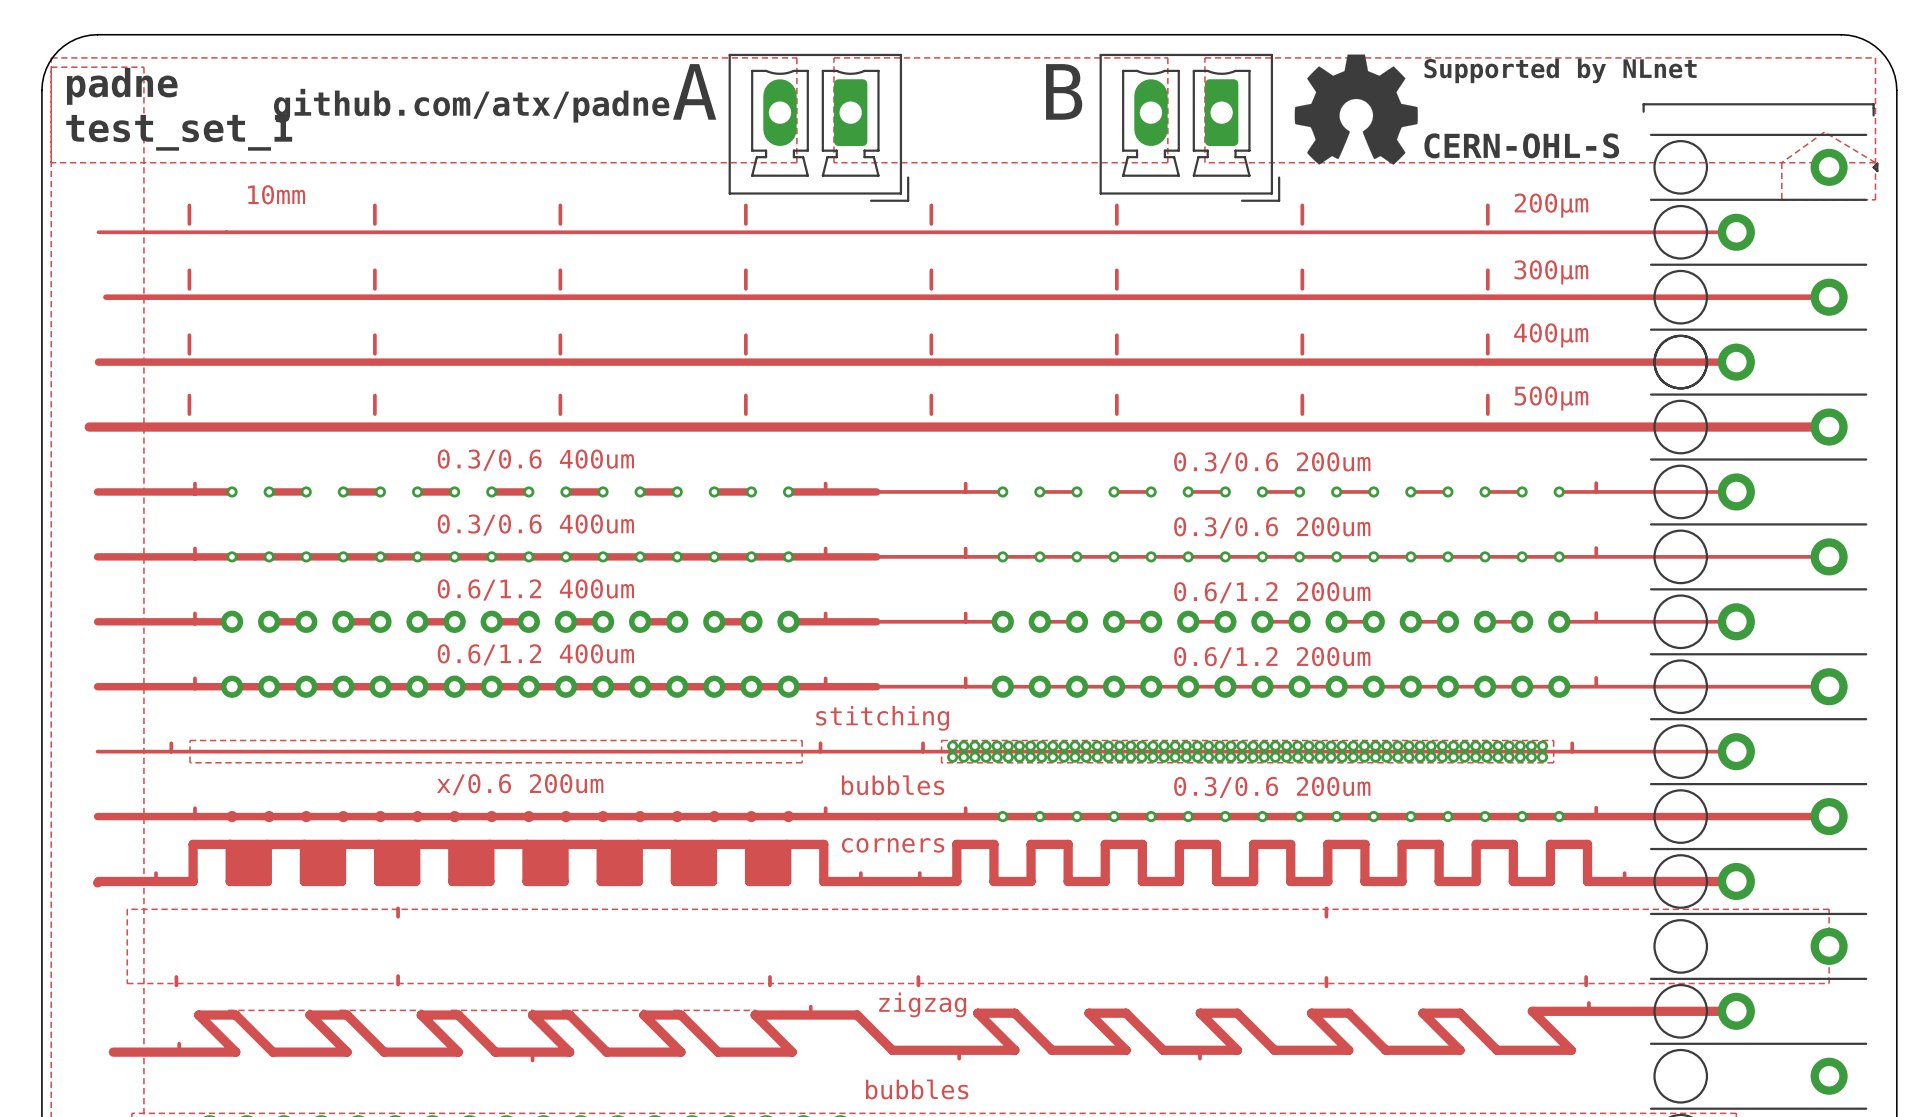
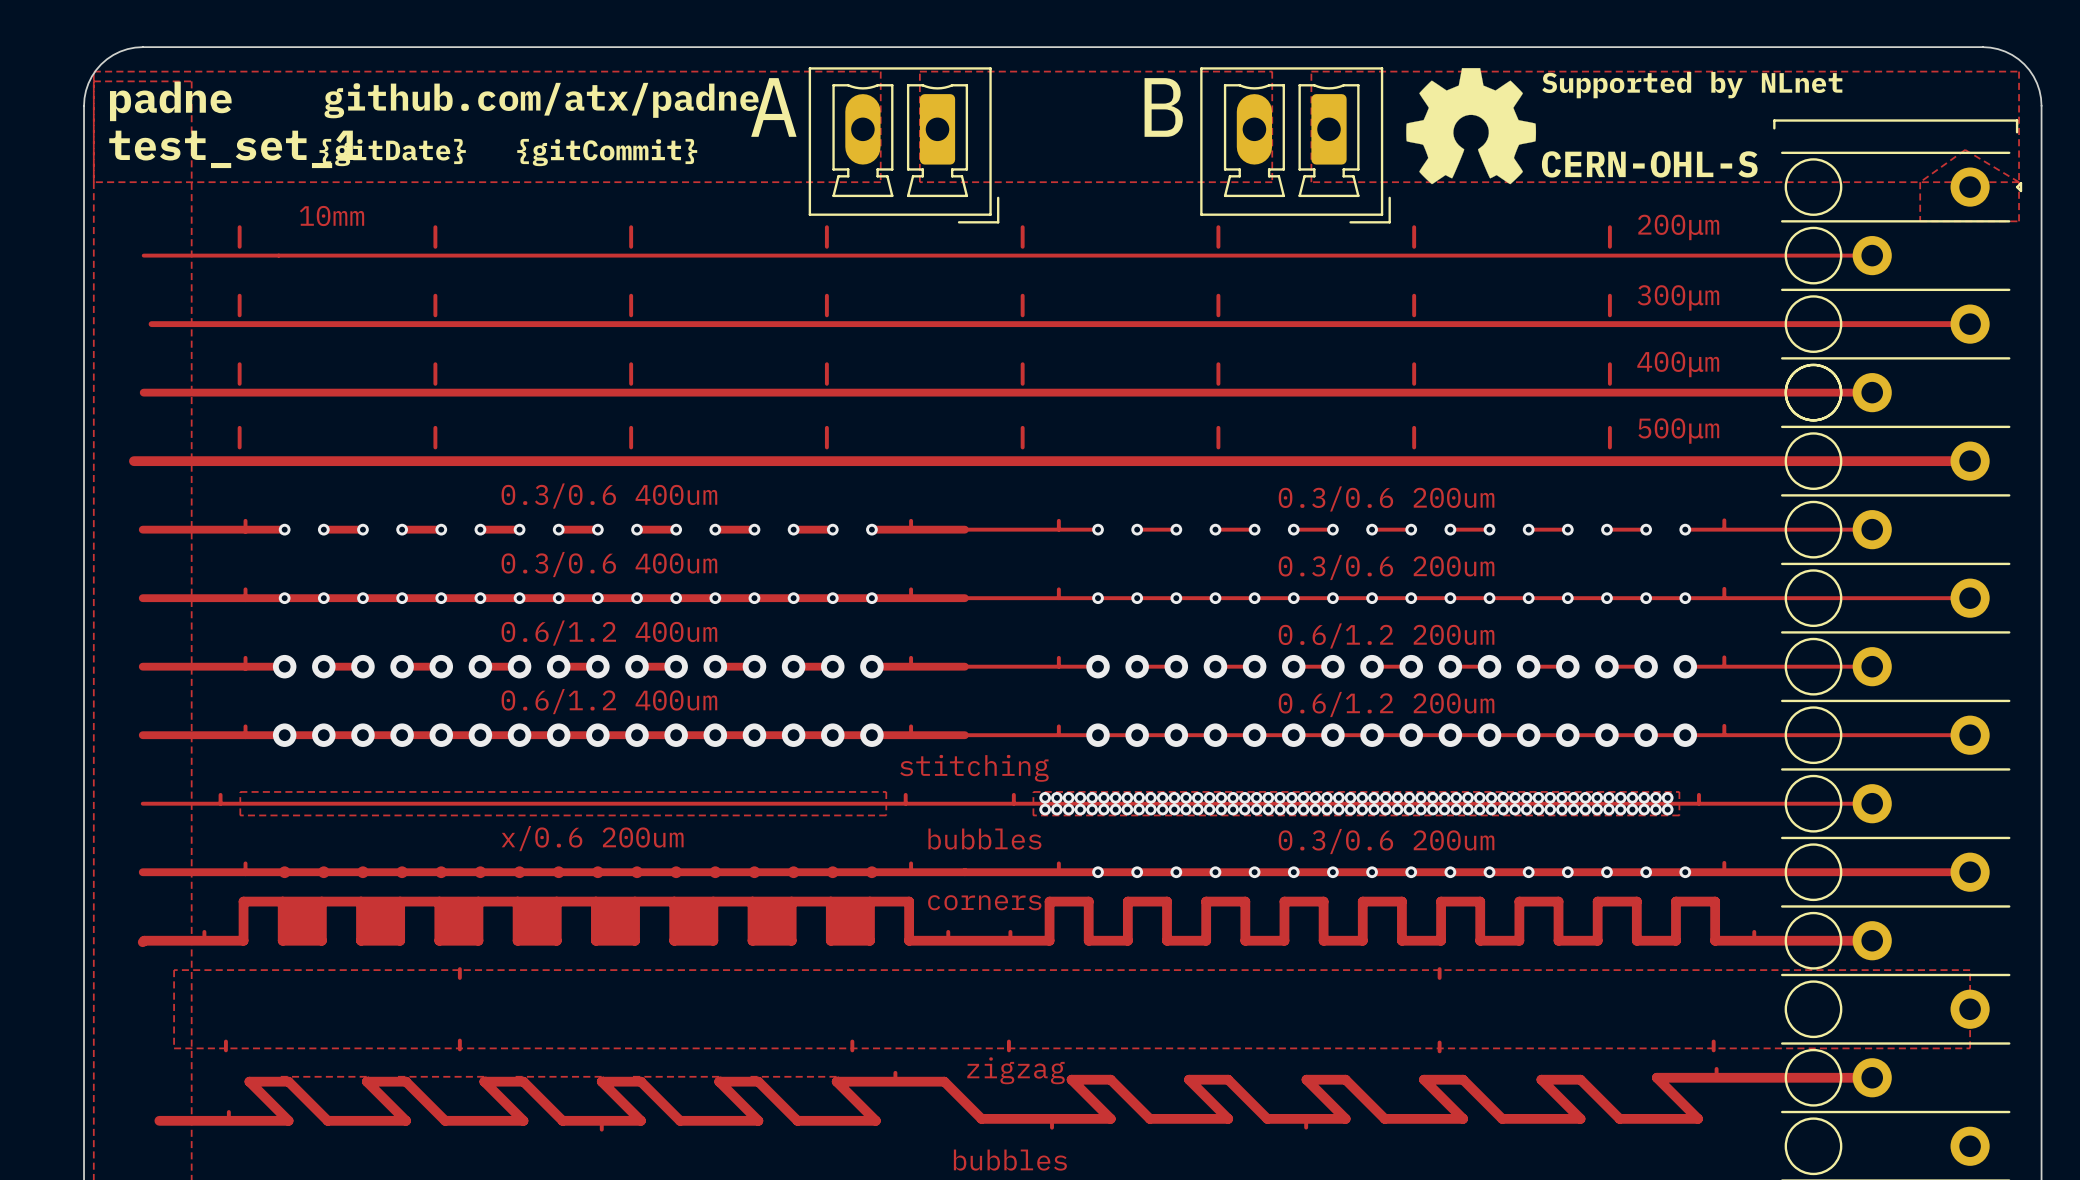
text position: github.com/atx/padne (471, 105) -> github.com/atx/padne (541, 100)
text: none -> {gitDate} (392, 152)
text: none -> {gitCommit} (607, 152)

